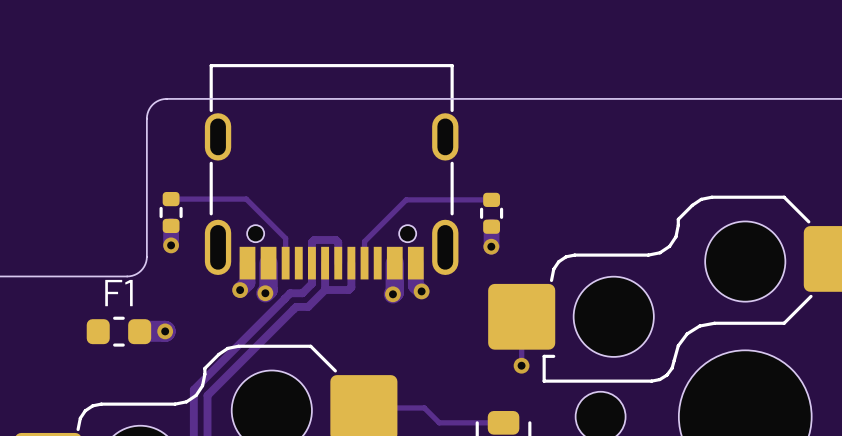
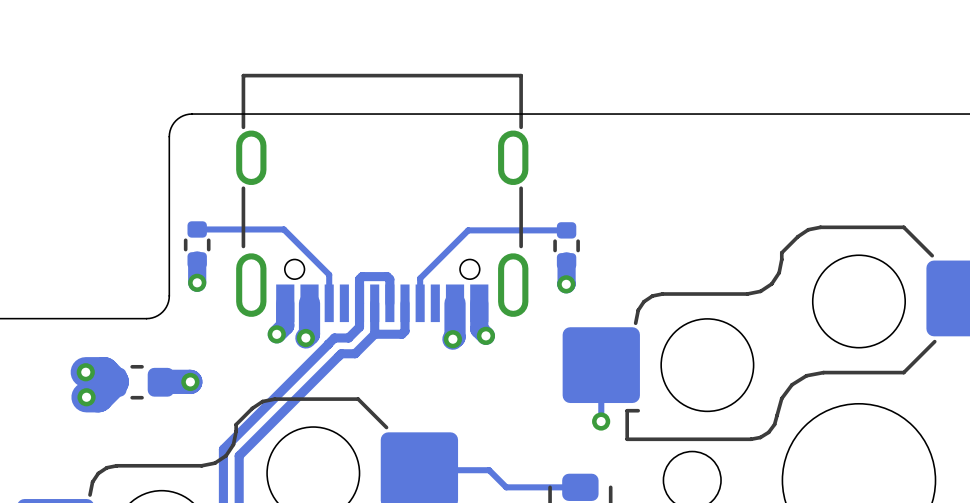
F1 name: F1 (118, 293) -> none
track: none -> (85, 372) (104, 372) (113, 381) (98, 397) (86, 397)
via: none -> (85, 372)
via: none -> (86, 397)

